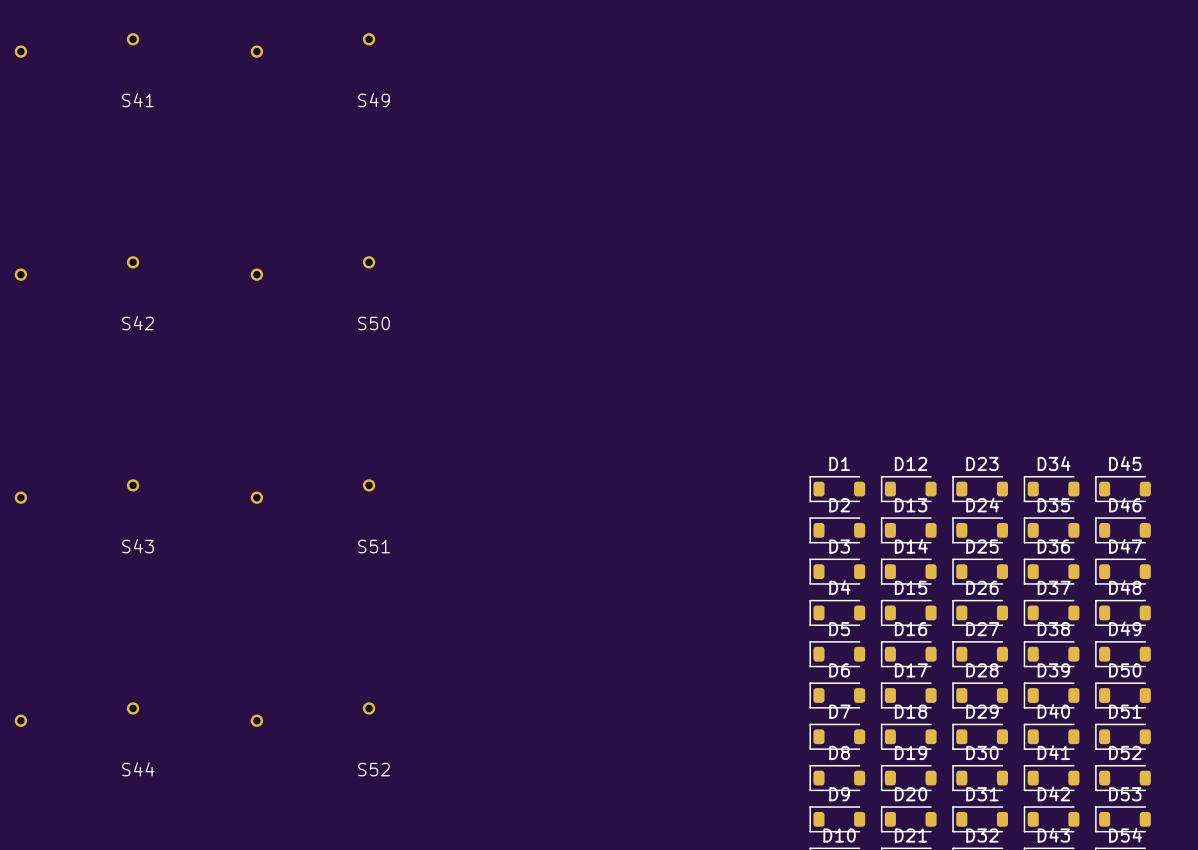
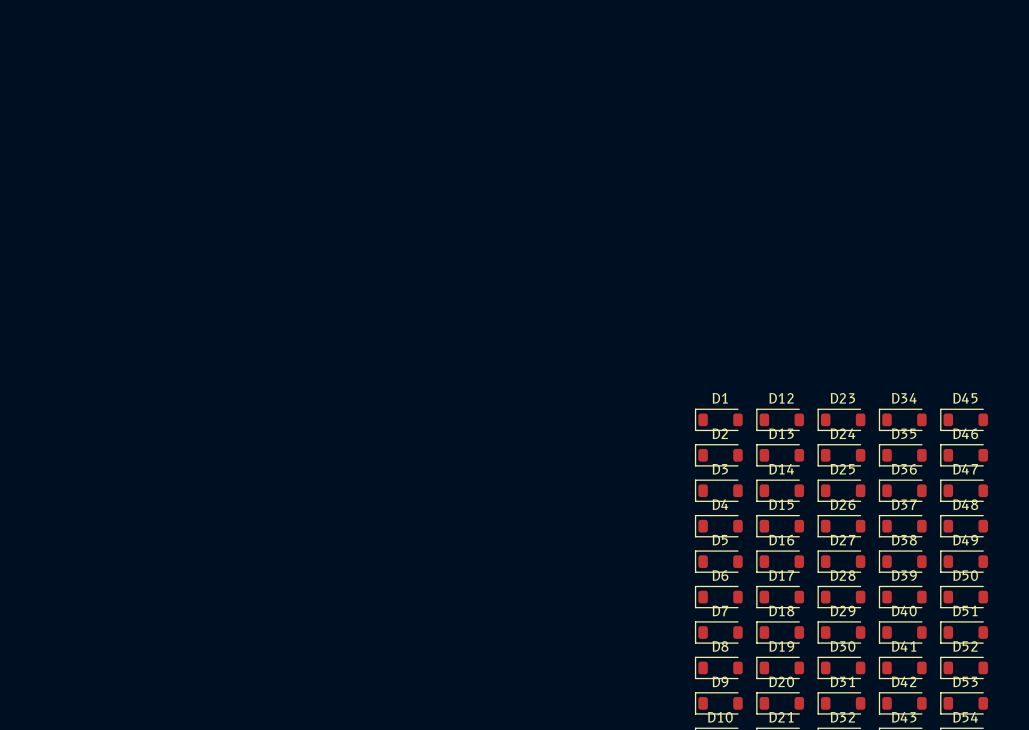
S41: (76, 45) -> none
S49: (312, 45) -> none
S42: (76, 268) -> none
S50: (312, 268) -> none
S43: (76, 491) -> none
S51: (312, 491) -> none
S44: (76, 714) -> none
S52: (312, 714) -> none

